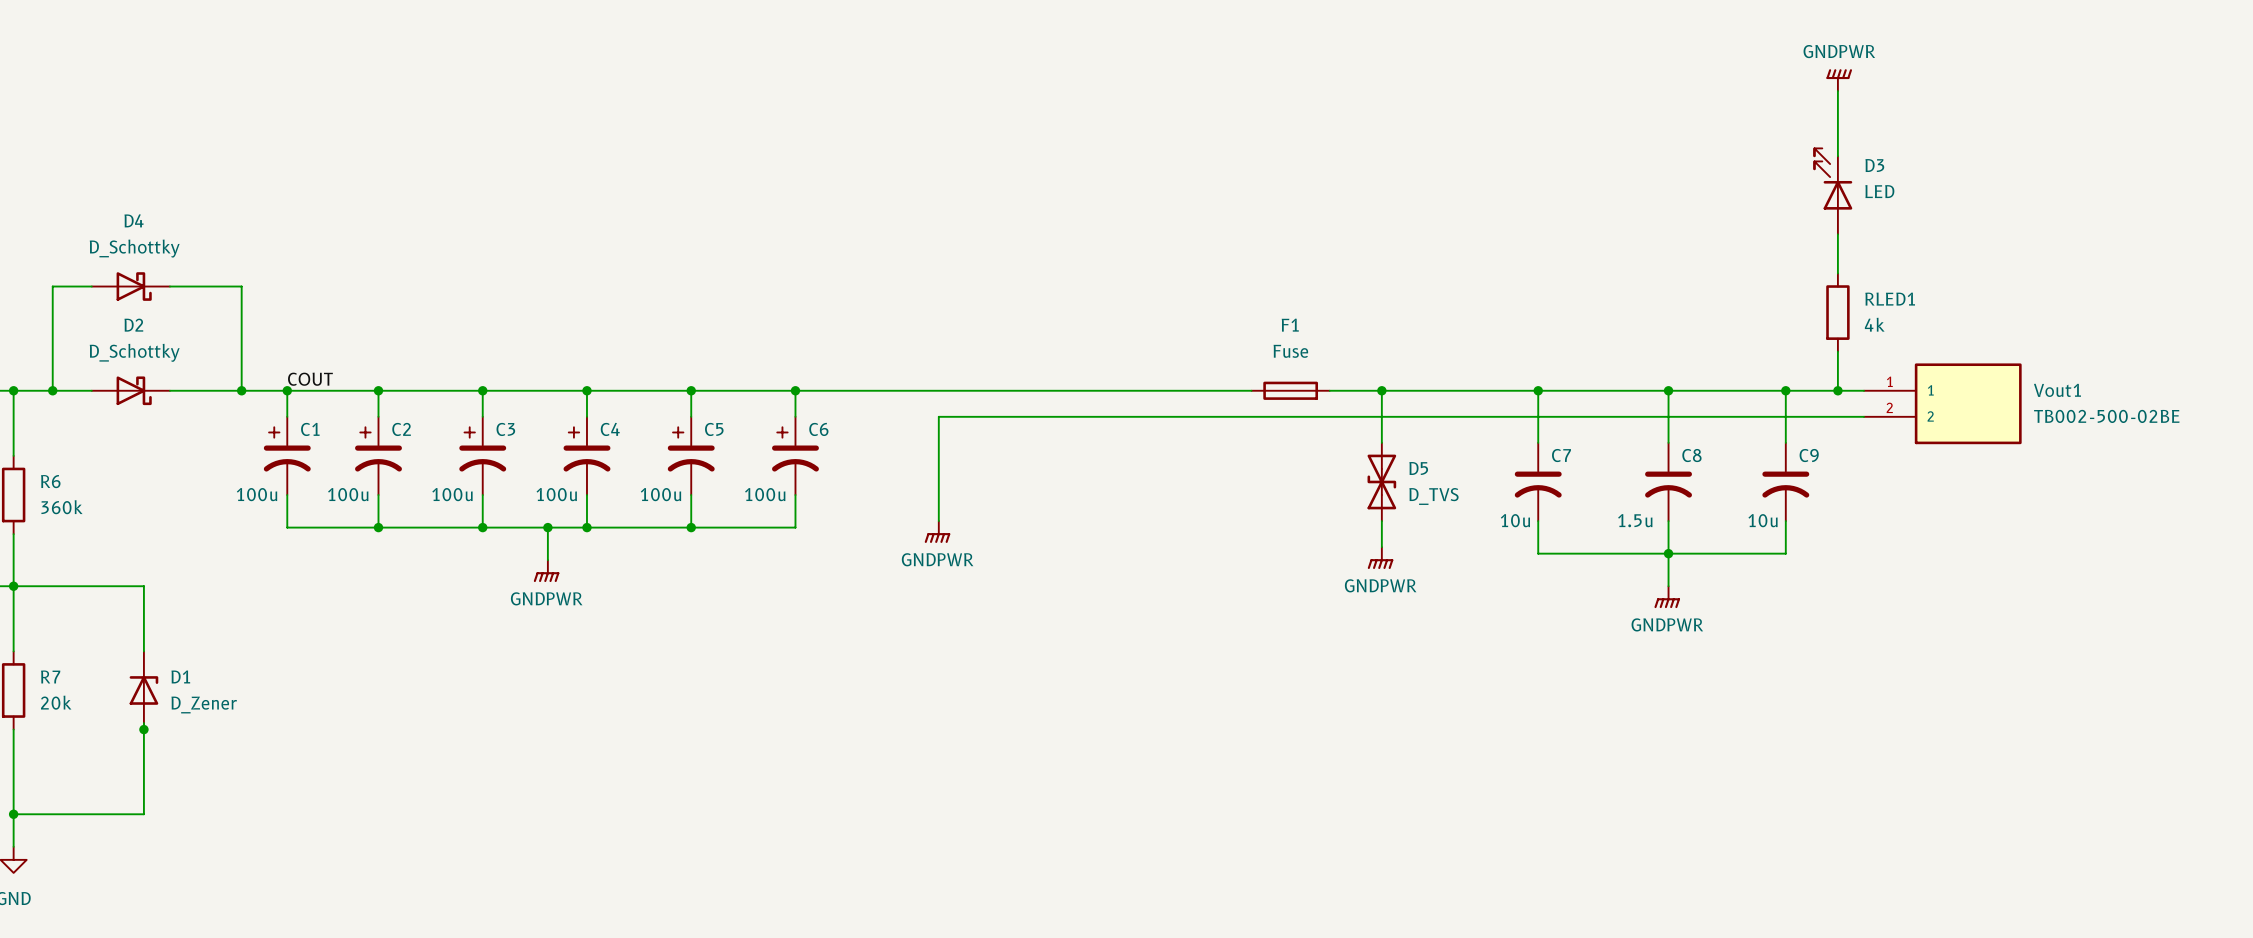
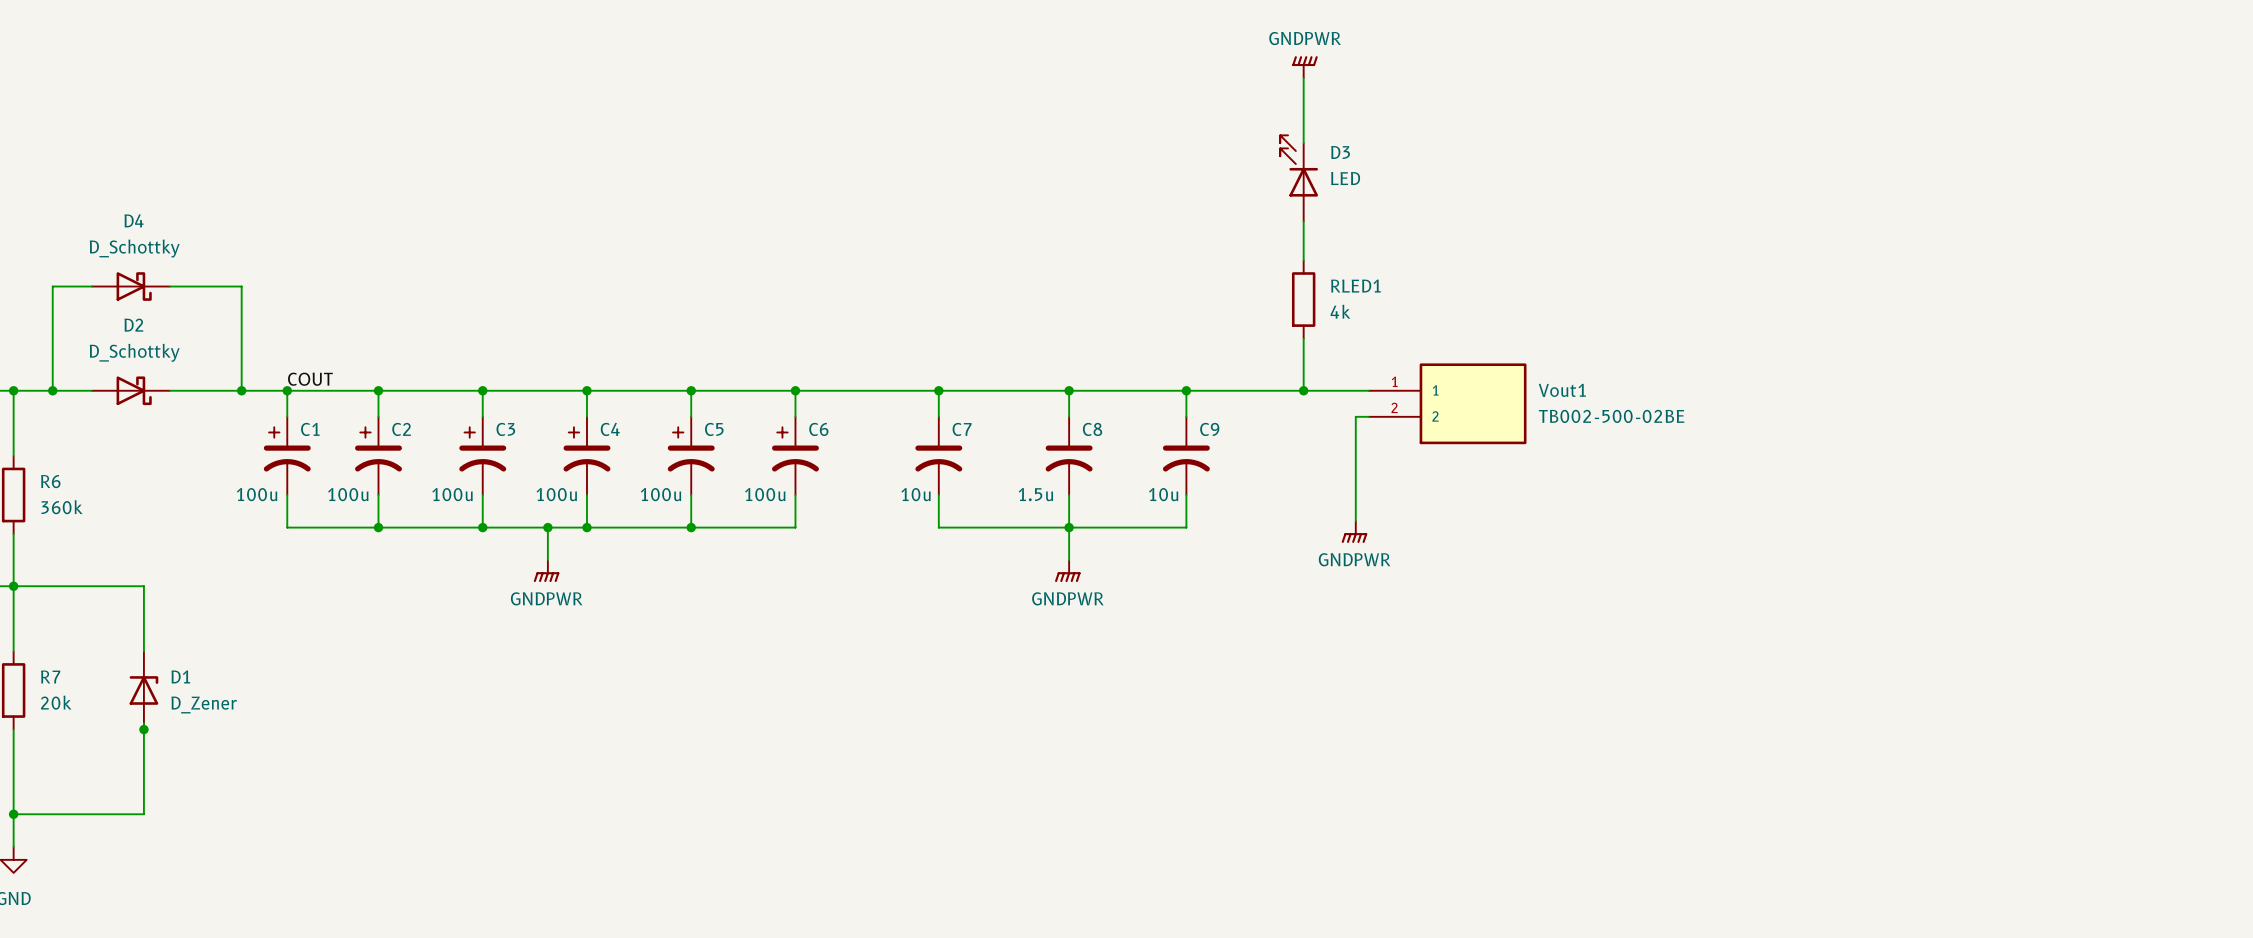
power symbol: none -> GNDPWR (1304, 67)
wire: none -> (1303, 78) (1303, 143)
power symbol: GNDPWR (1839, 80) -> none
wire: (1837, 91) (1837, 156) -> none
D3 position: (1833, 191) -> (1299, 178)
wire: none -> (1303, 221) (1303, 260)
wire: (1837, 234) (1837, 273) -> none
RLED1 position: (1837, 312) -> (1303, 299)
wire: (1837, 351) (1837, 390) -> none
wire: none -> (938, 390) (938, 416)
junction: none -> (938, 390)
wire: none -> (1069, 390) (1069, 416)
junction: none -> (1069, 390)
junction: none -> (1186, 390)
F1: Fuse (1290, 390) -> none
junction: none -> (1303, 390)
wire: (1368, 390) (1863, 390) -> none
wire: (1381, 390) (1381, 442) -> (1303, 338) (1303, 390)
junction: (1381, 390) -> none
wire: (1538, 390) (1538, 442) -> none
junction: (1538, 390) -> none
wire: (1668, 390) (1668, 442) -> none
junction: (1668, 390) -> none
wire: (1785, 390) (1785, 442) -> none
junction: (1785, 390) -> none
junction: (1837, 390) -> none
Vout1 position: (1942, 403) -> (1447, 403)
wire: (1355, 416) (938, 416) (938, 495) -> (1355, 416) (1355, 521)
wire: (1368, 416) (1863, 416) -> none
D5: D_TVS (1381, 481) -> none
C7 position: (1538, 481) -> (938, 455)
C8 position: (1668, 481) -> (1069, 455)
C9 position: (1785, 481) -> (1186, 455)
wire: none -> (1069, 495) (1069, 560)
wire: none -> (1186, 495) (1186, 527) (938, 527) (938, 521)
wire: (1381, 521) (1381, 547) -> (1186, 390) (1186, 416)
wire: (1538, 521) (1538, 553) (1785, 553) (1785, 521) -> none
wire: (1668, 521) (1668, 586) -> none
junction: none -> (1069, 527)
power symbol position: GNDPWR (937, 532) -> GNDPWR (1067, 571)
junction: (1668, 553) -> none
power symbol position: GNDPWR (1380, 558) -> GNDPWR (1354, 532)
power symbol: GNDPWR (1667, 597) -> none

